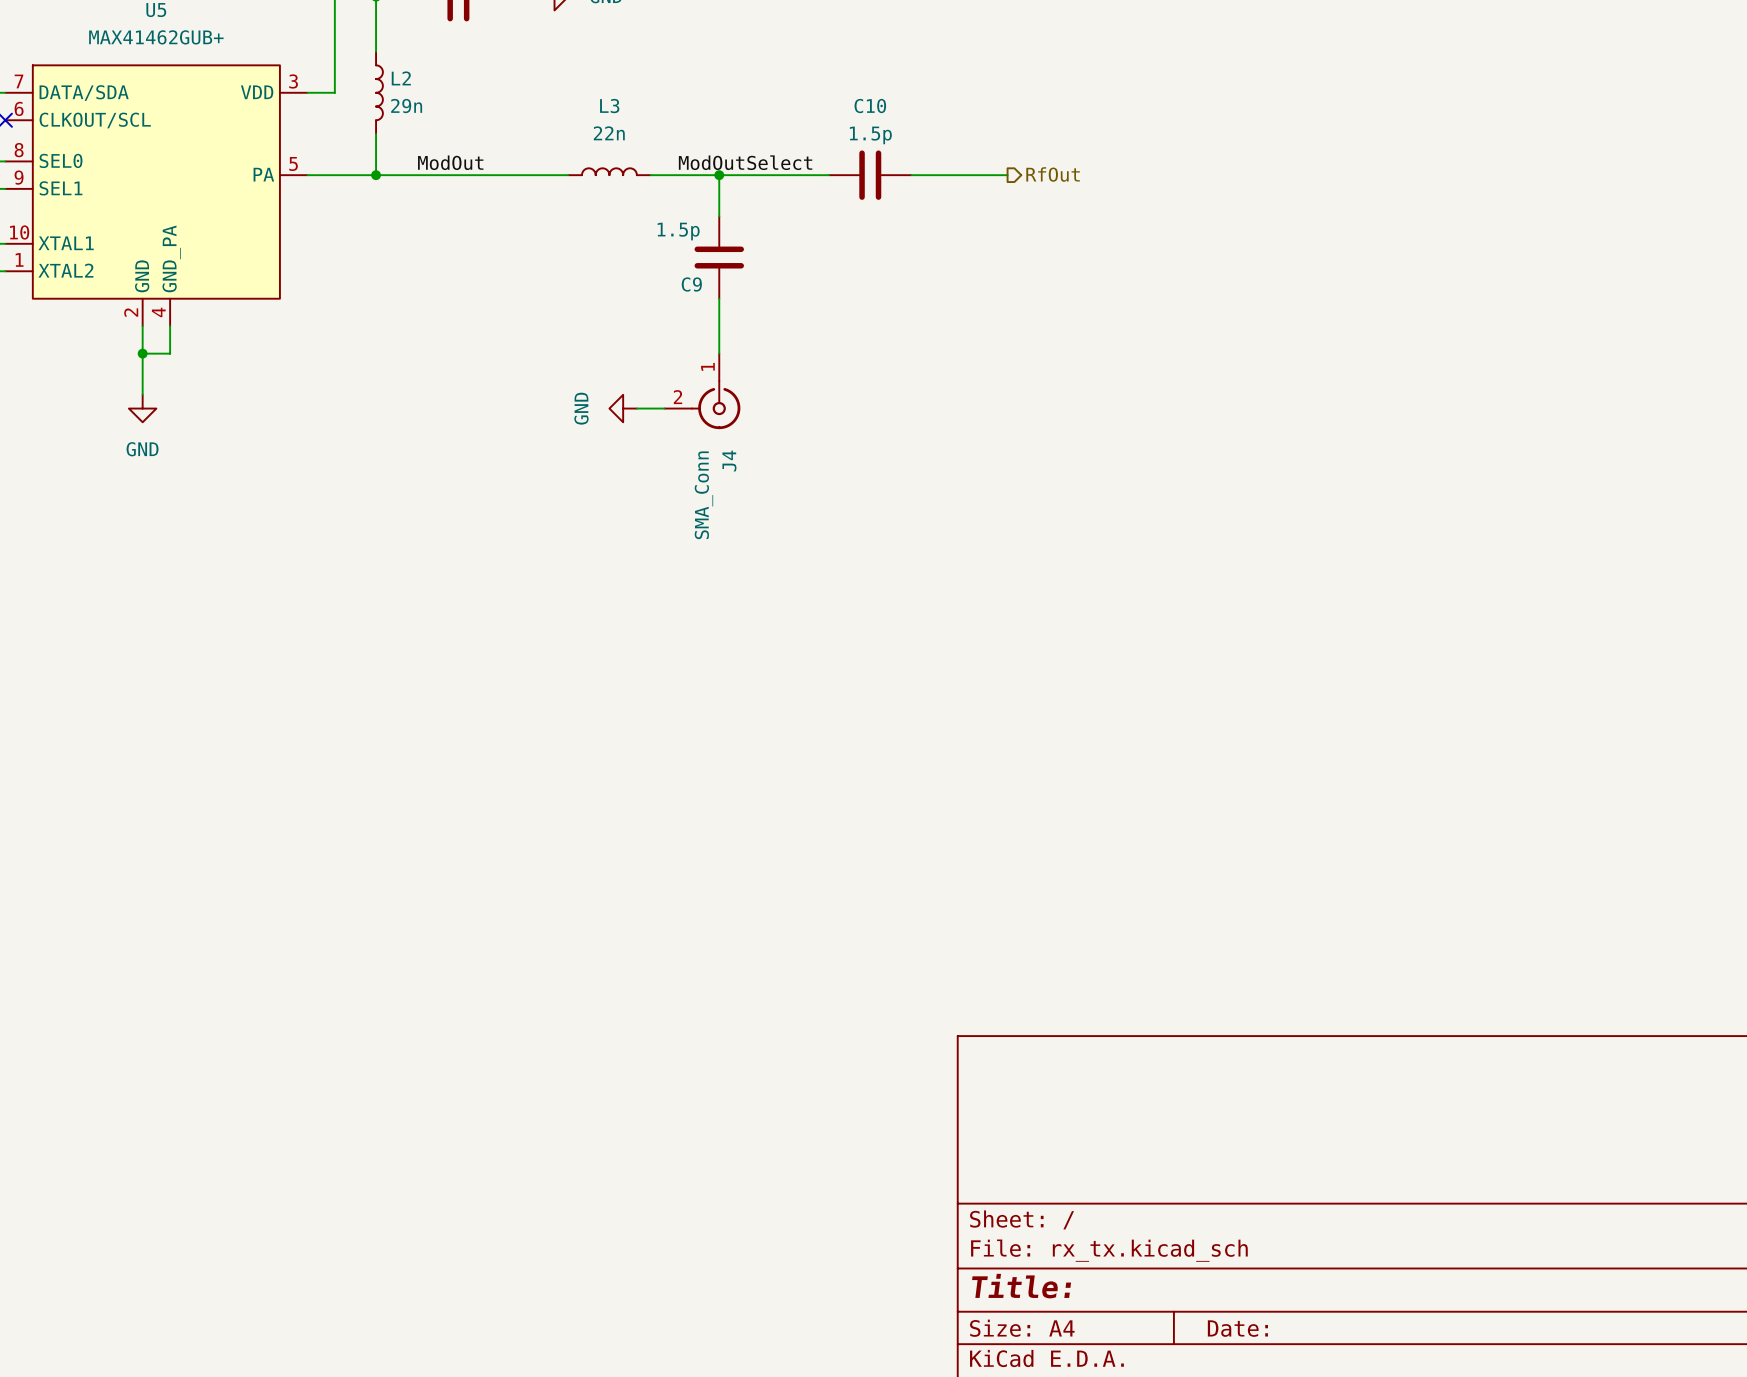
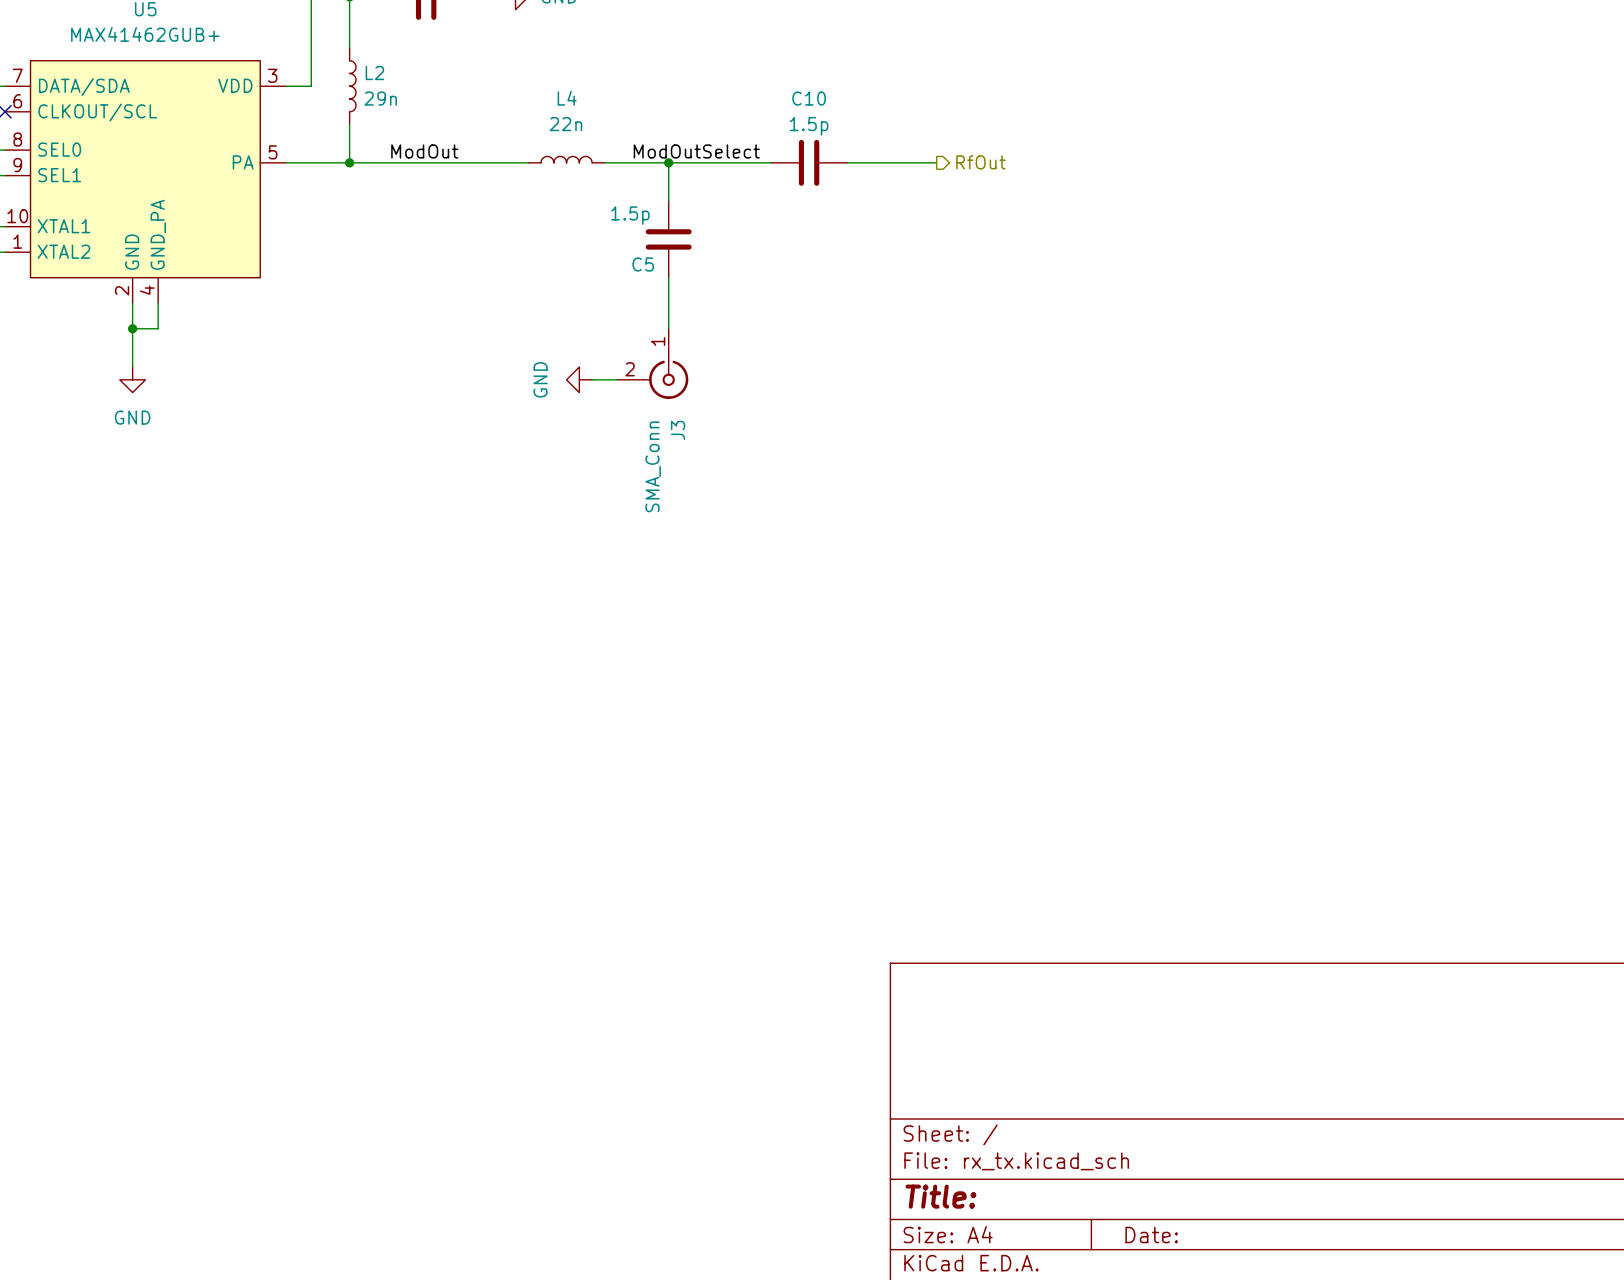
L3 name: L3 (609, 106) -> L4 (567, 98)
C9 name: C9 (691, 284) -> C5 (643, 264)
J4 name: J4 (729, 461) -> J3 (678, 430)

